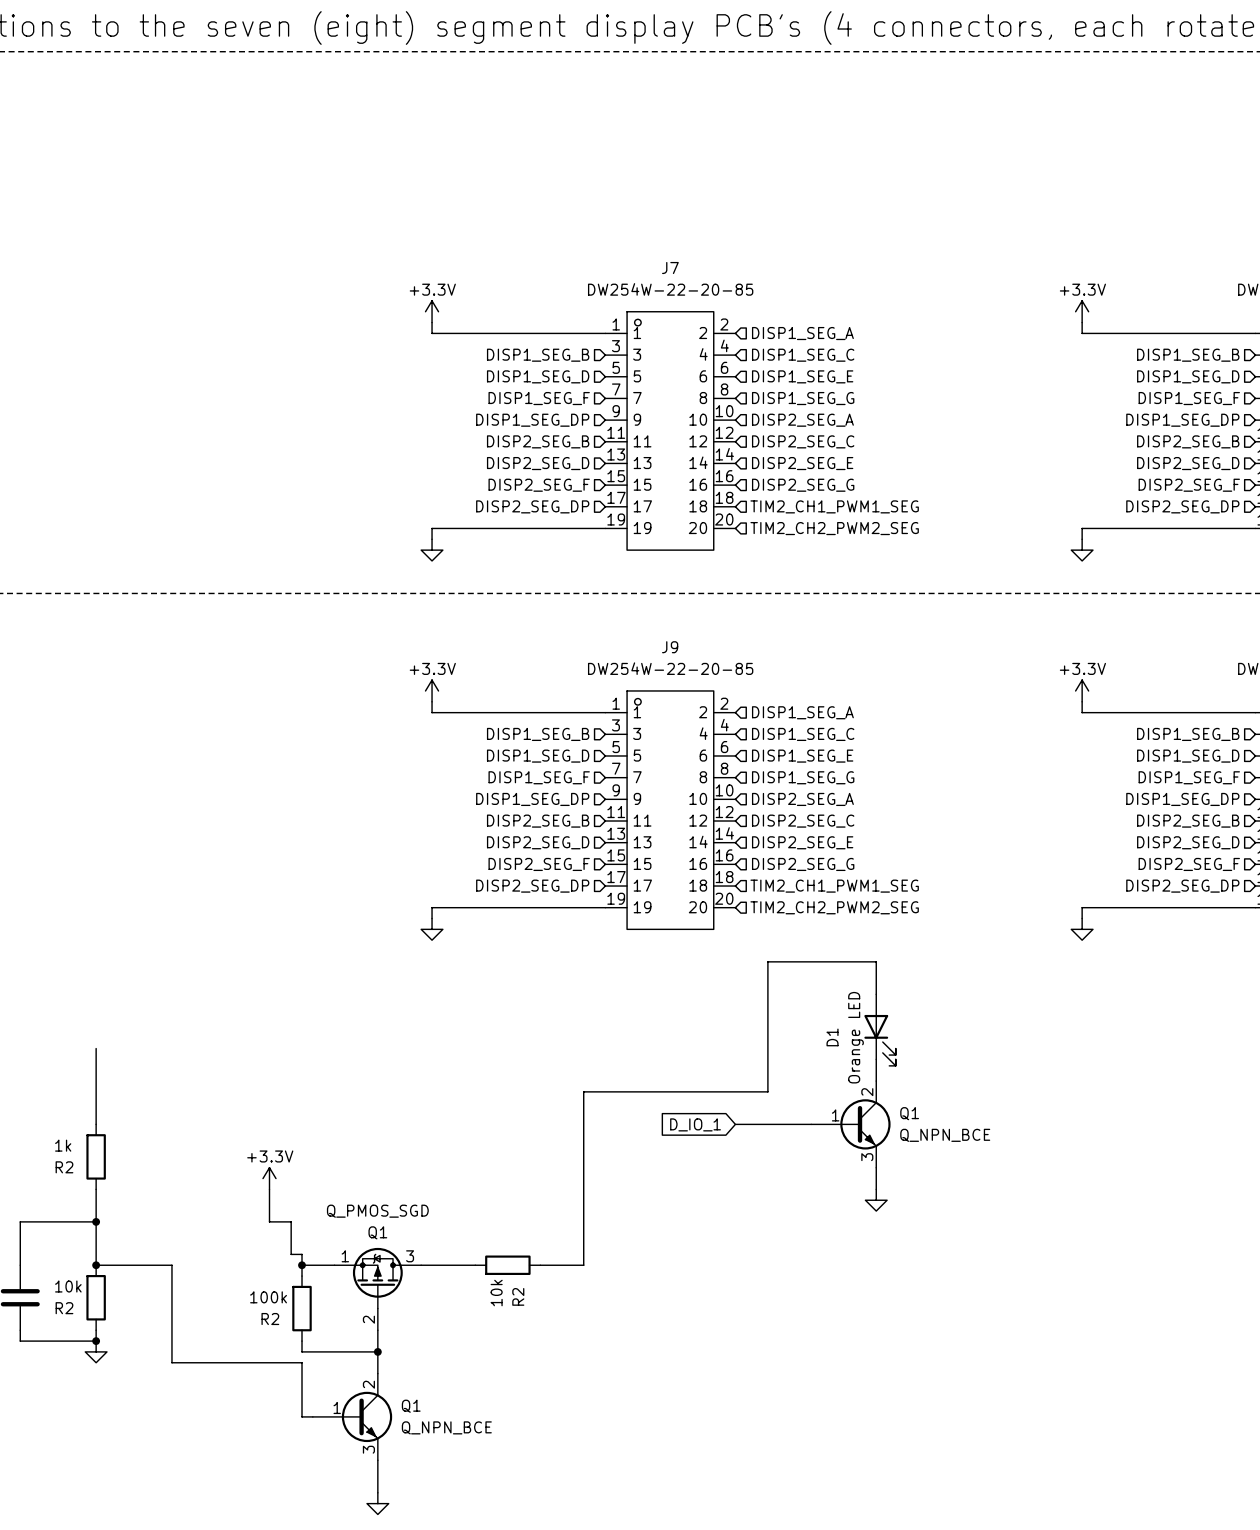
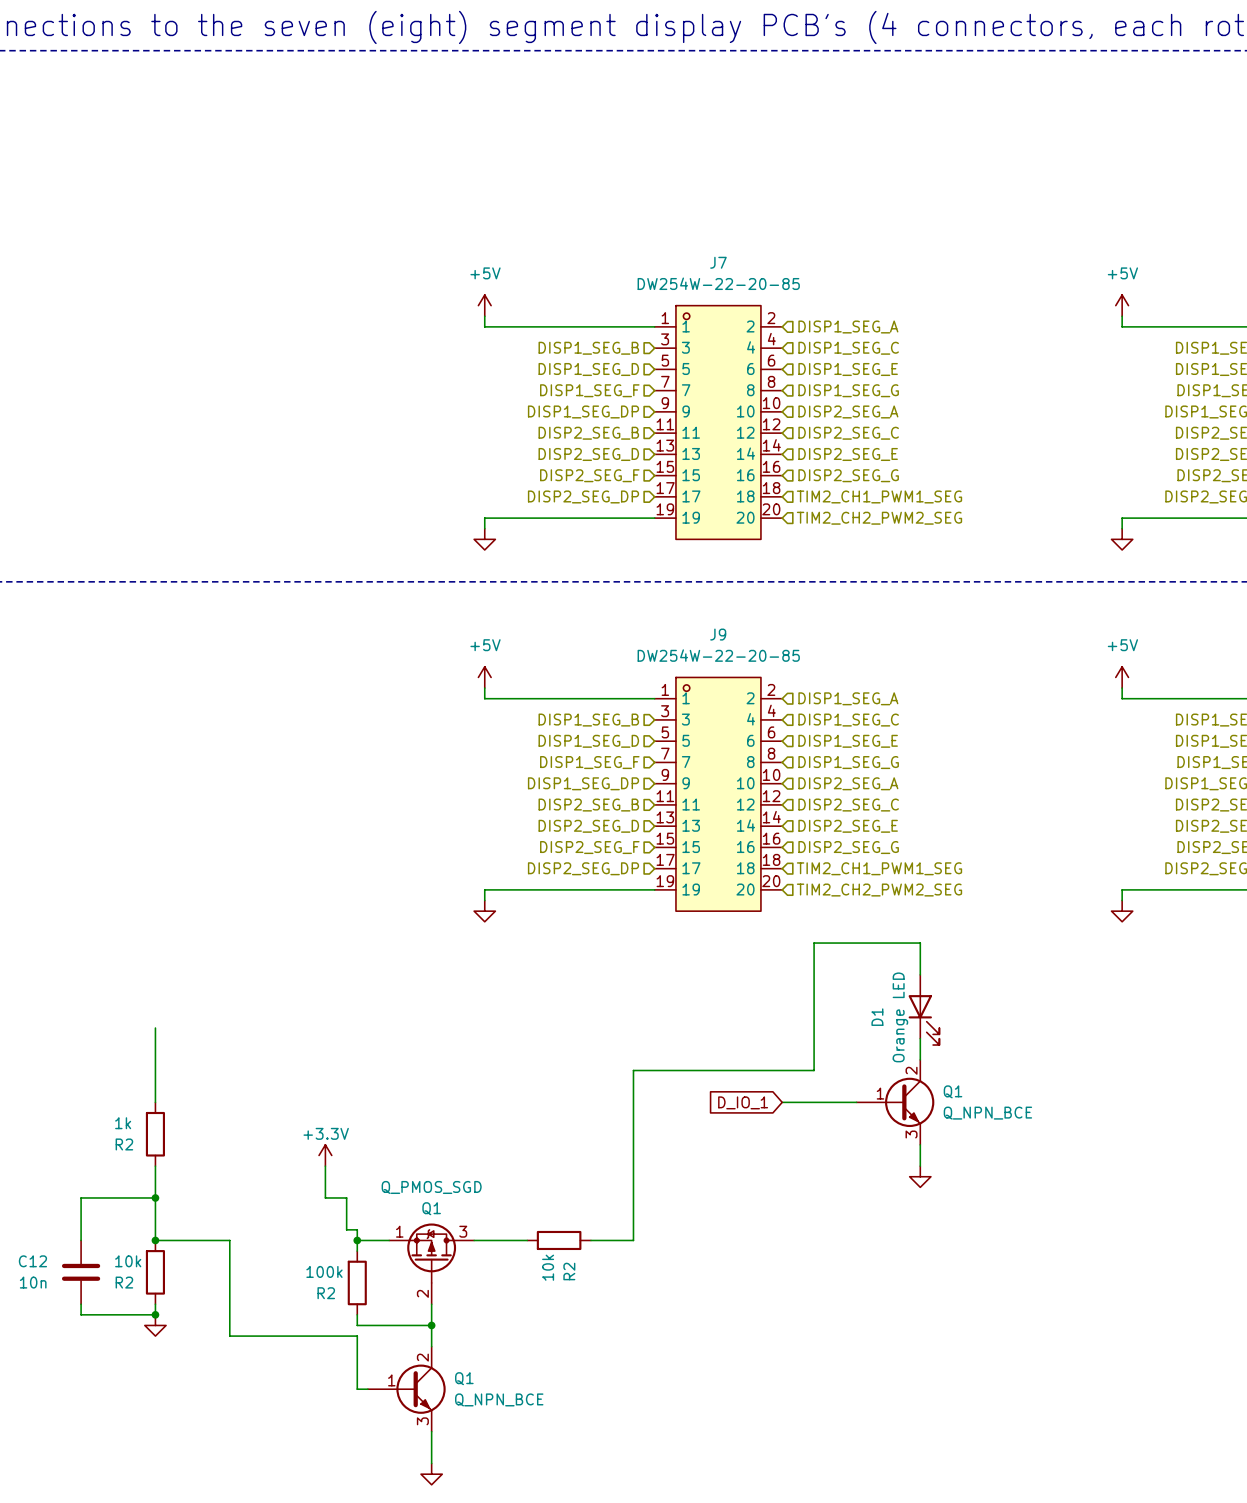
power symbol: +3.3V (432, 311) -> +5V (484, 305)
power symbol: +3.3V (1082, 311) -> +5V (1122, 305)
power symbol: +3.3V (432, 690) -> +5V (484, 677)
power symbol: +3.3V (1082, 690) -> +5V (1122, 677)

